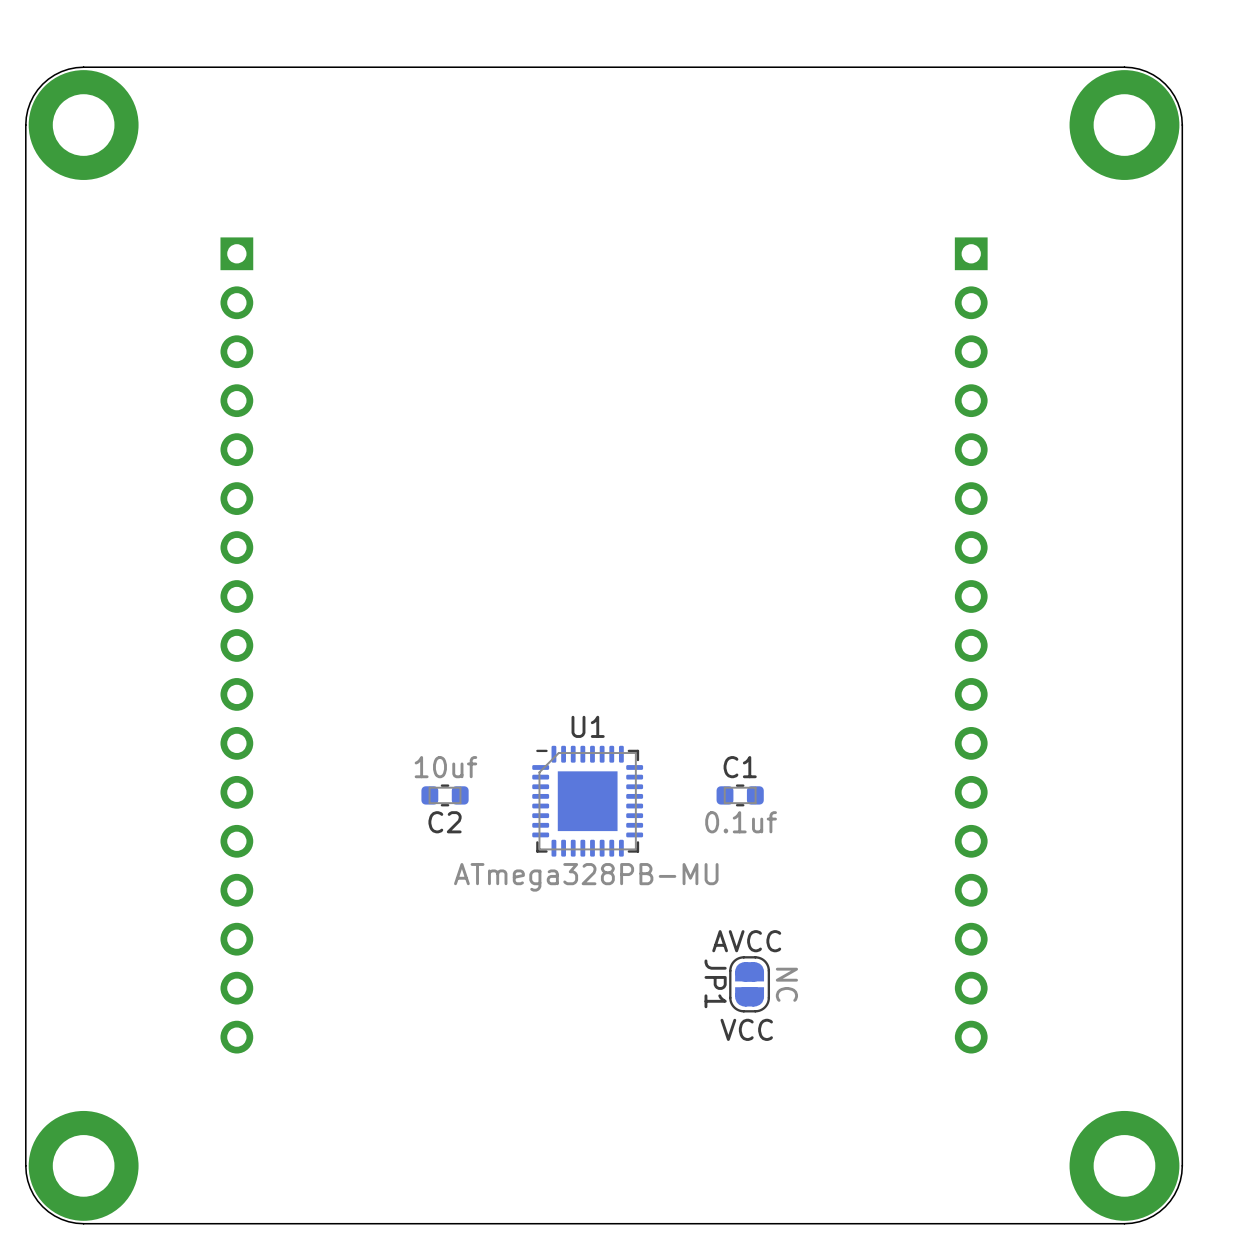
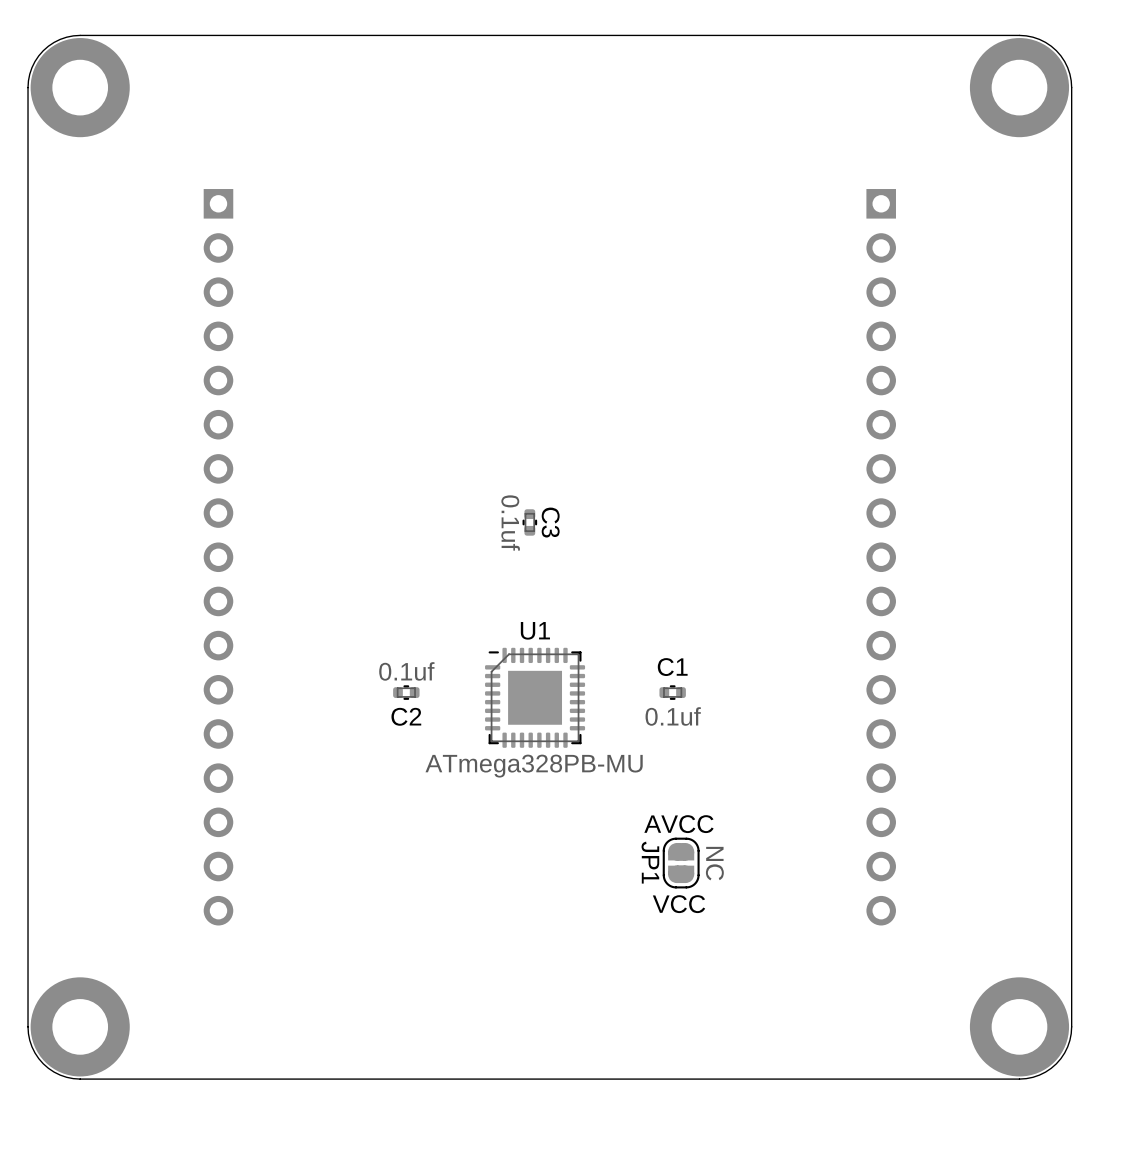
C3: none -> 0.1uf (529, 522)
C2 value: 10uf (445, 767) -> 0.1uf (406, 671)
C2 footprint: [421, 784, 469, 807] -> [393, 685, 420, 700]
C1 footprint: [716, 784, 764, 807] -> [659, 685, 686, 700]

